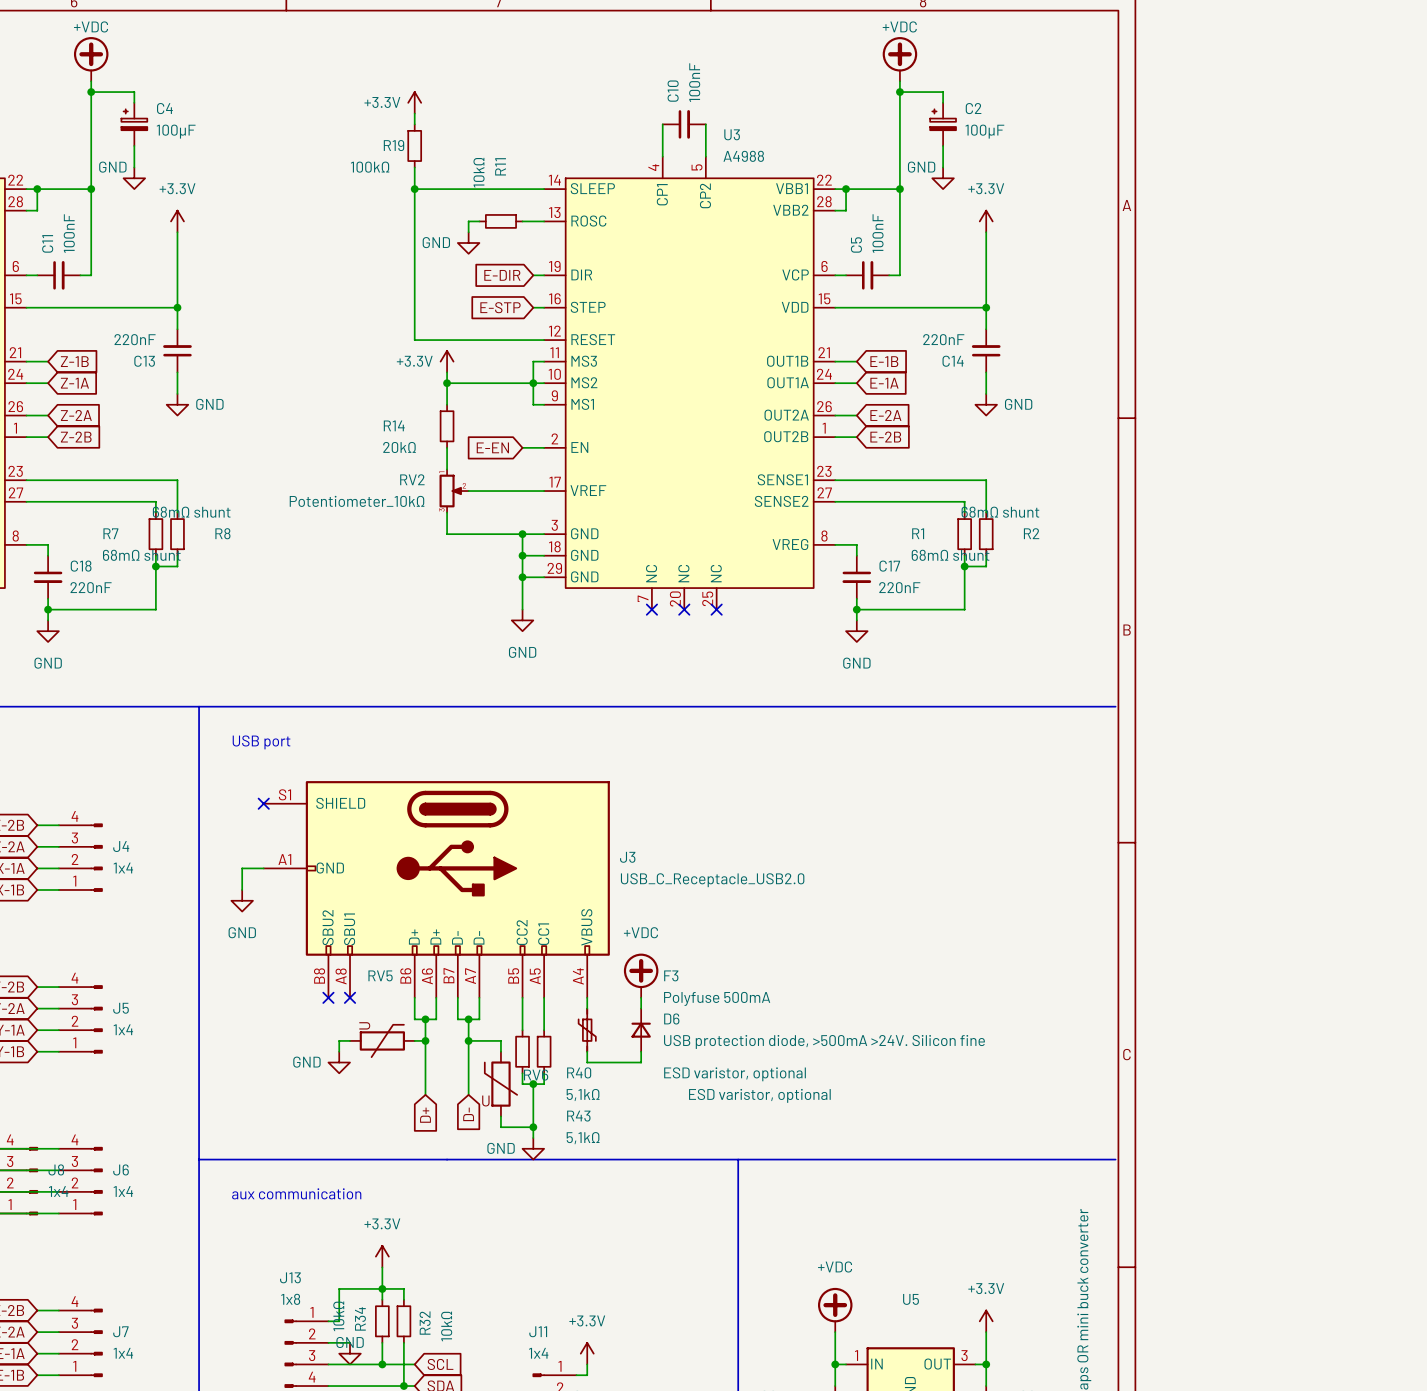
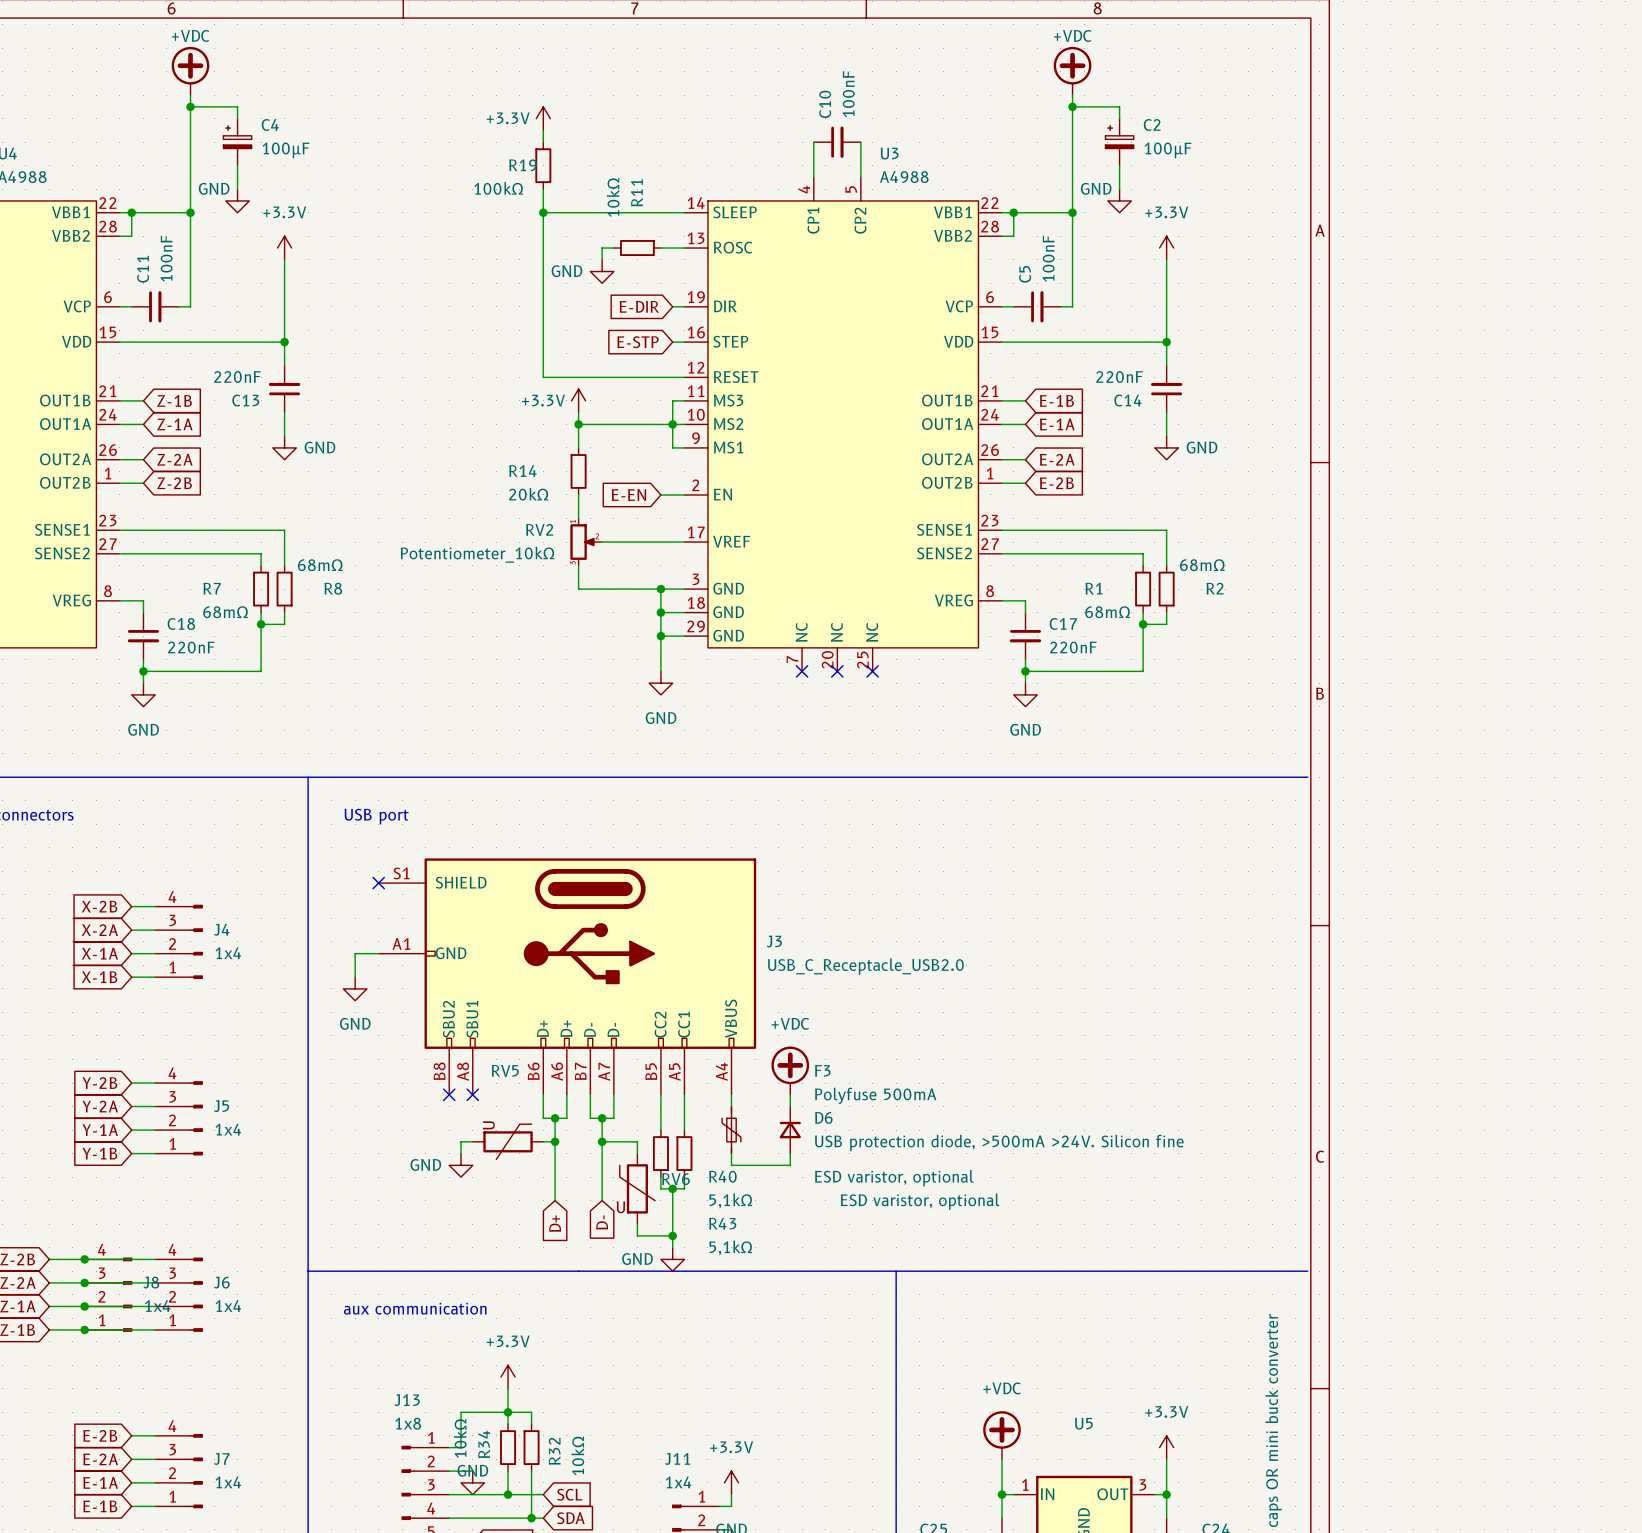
R8 value: 68mΩ shunt (191, 512) -> 68mΩ (320, 565)
R2 value: 68mΩ shunt (1000, 512) -> 68mΩ (1202, 565)
R7 value: 68mΩ shunt (141, 555) -> 68mΩ (225, 612)
R1 value: 68mΩ shunt (950, 555) -> 68mΩ (1107, 612)

